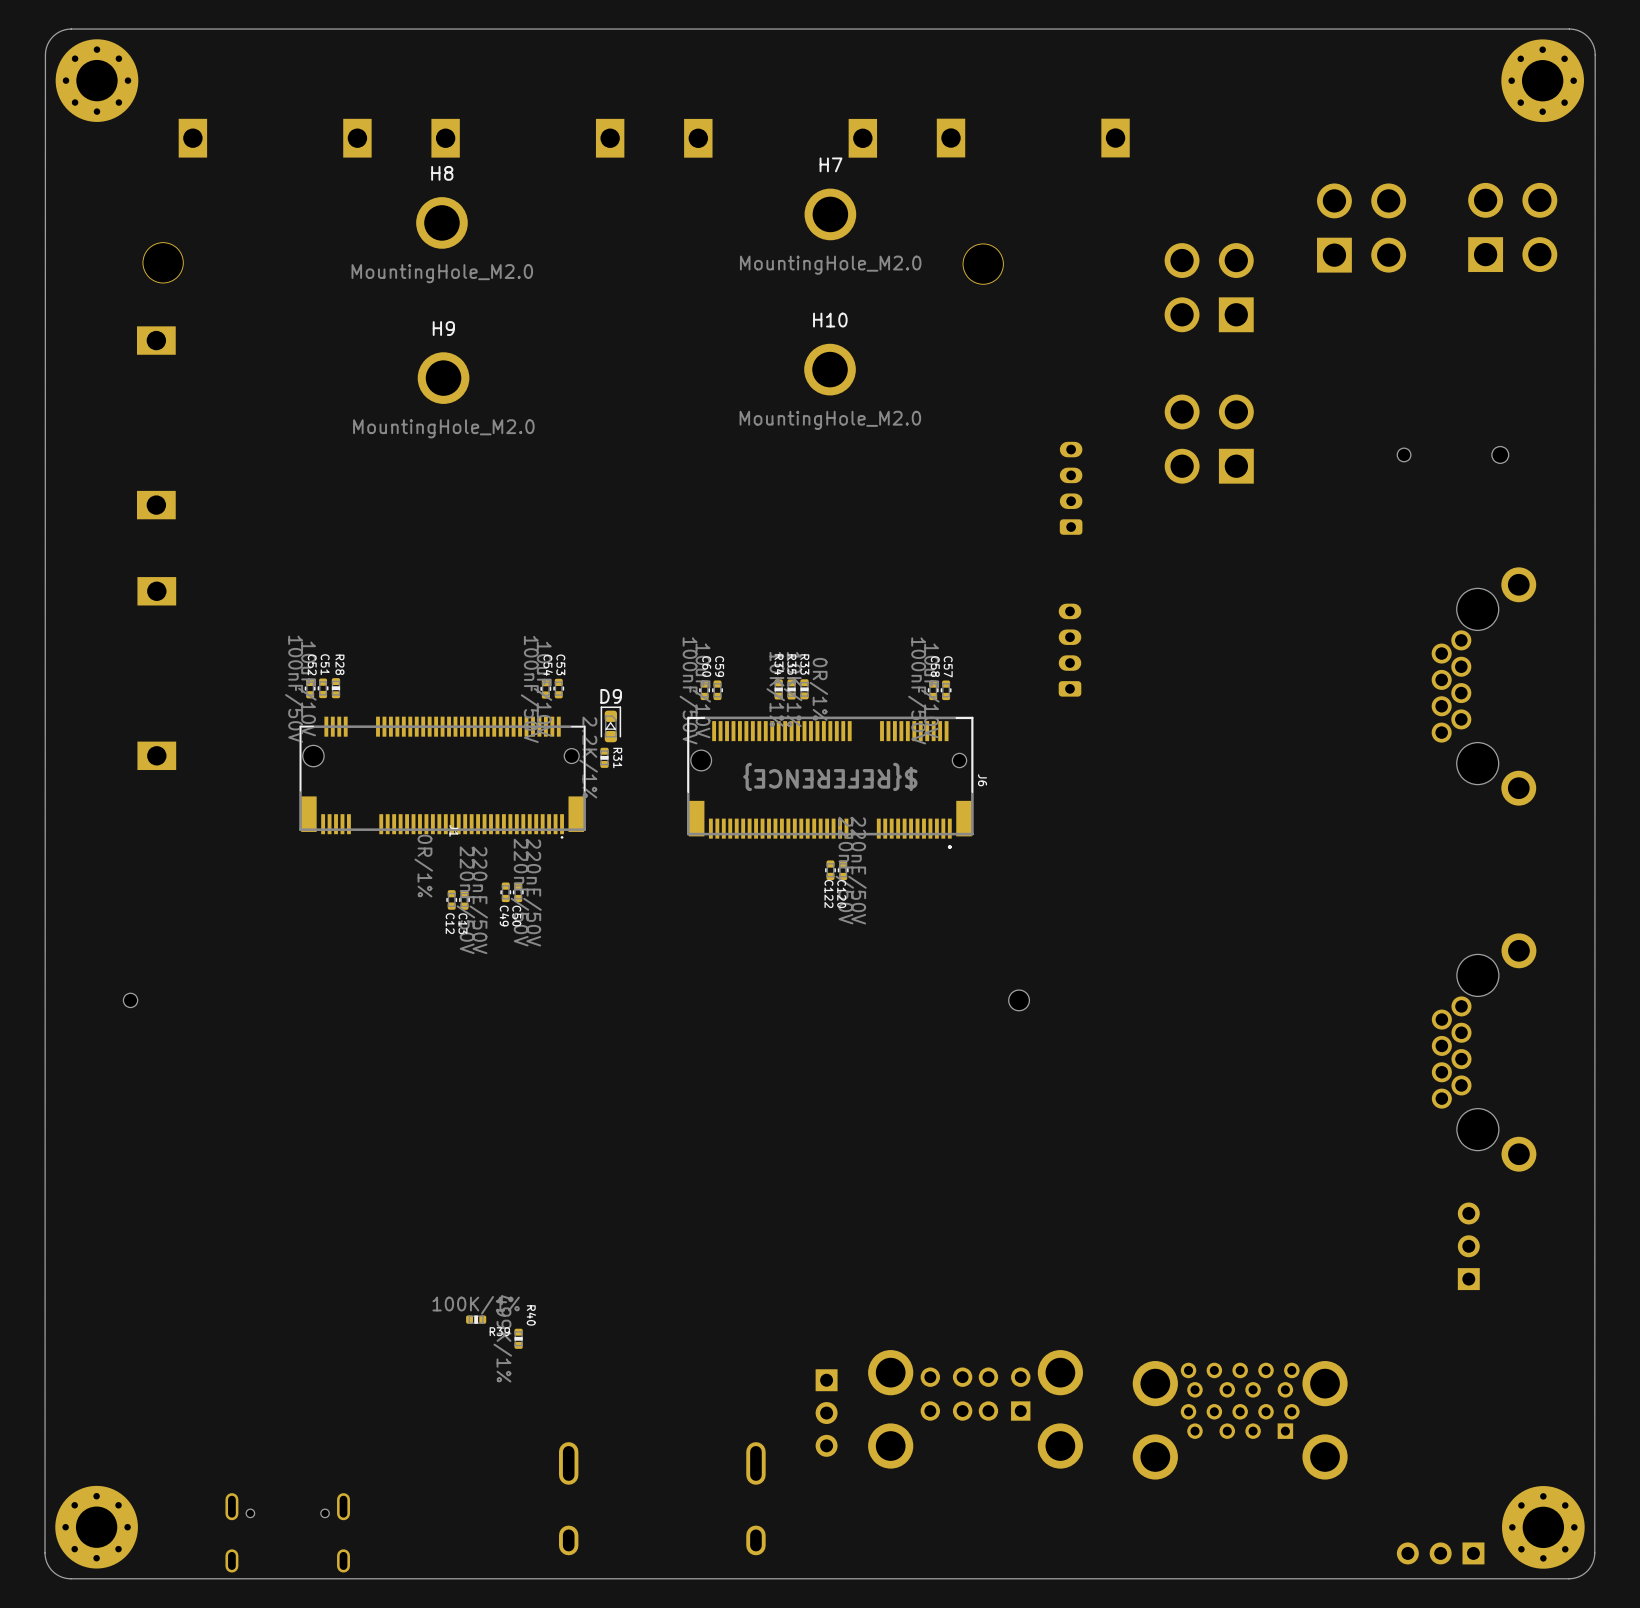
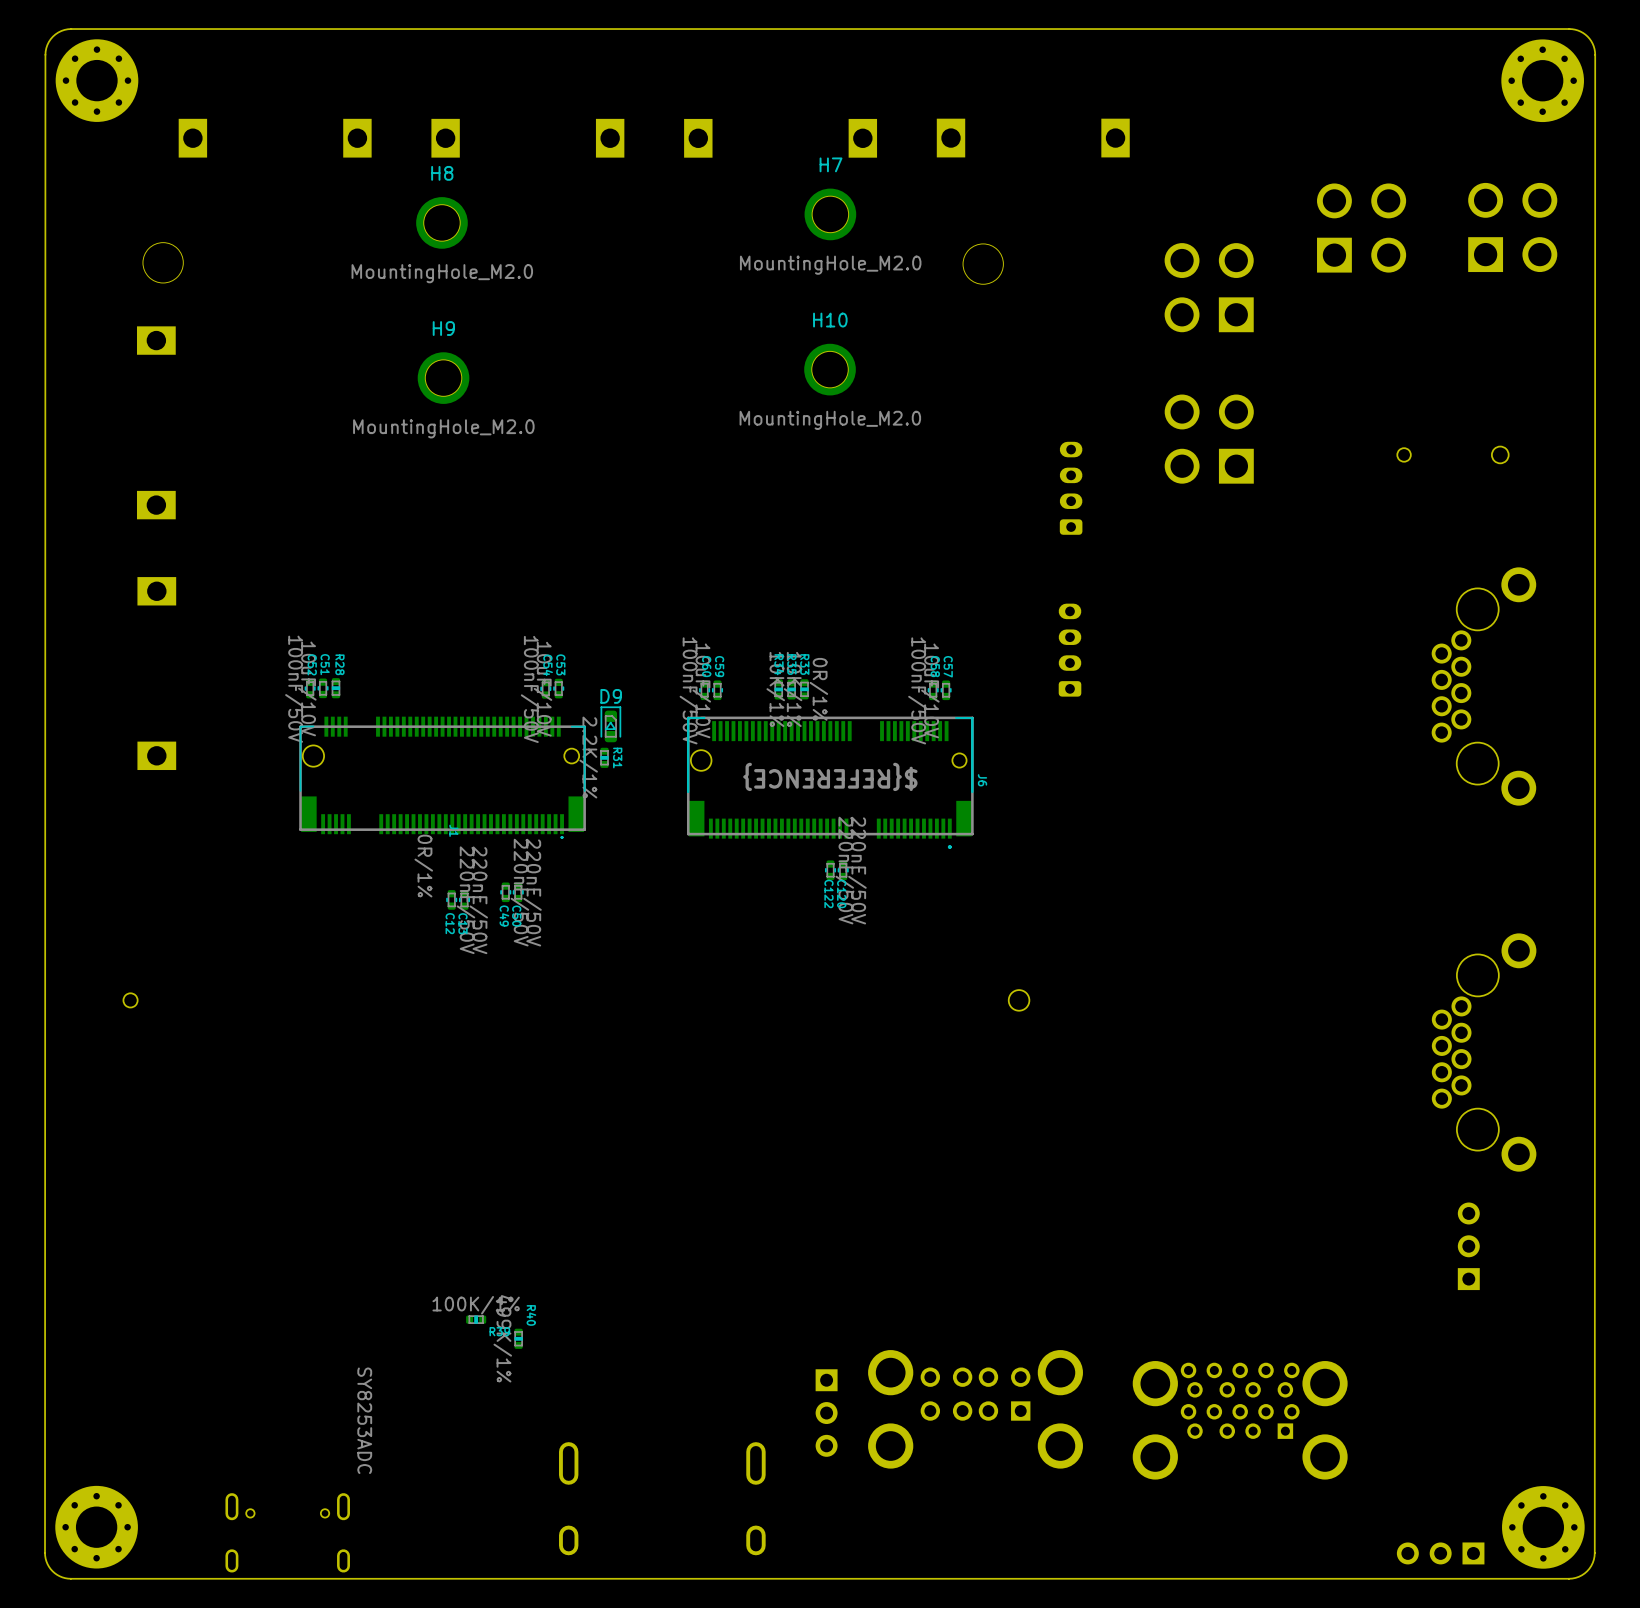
part: none -> SY8253ADC (364, 1420)

